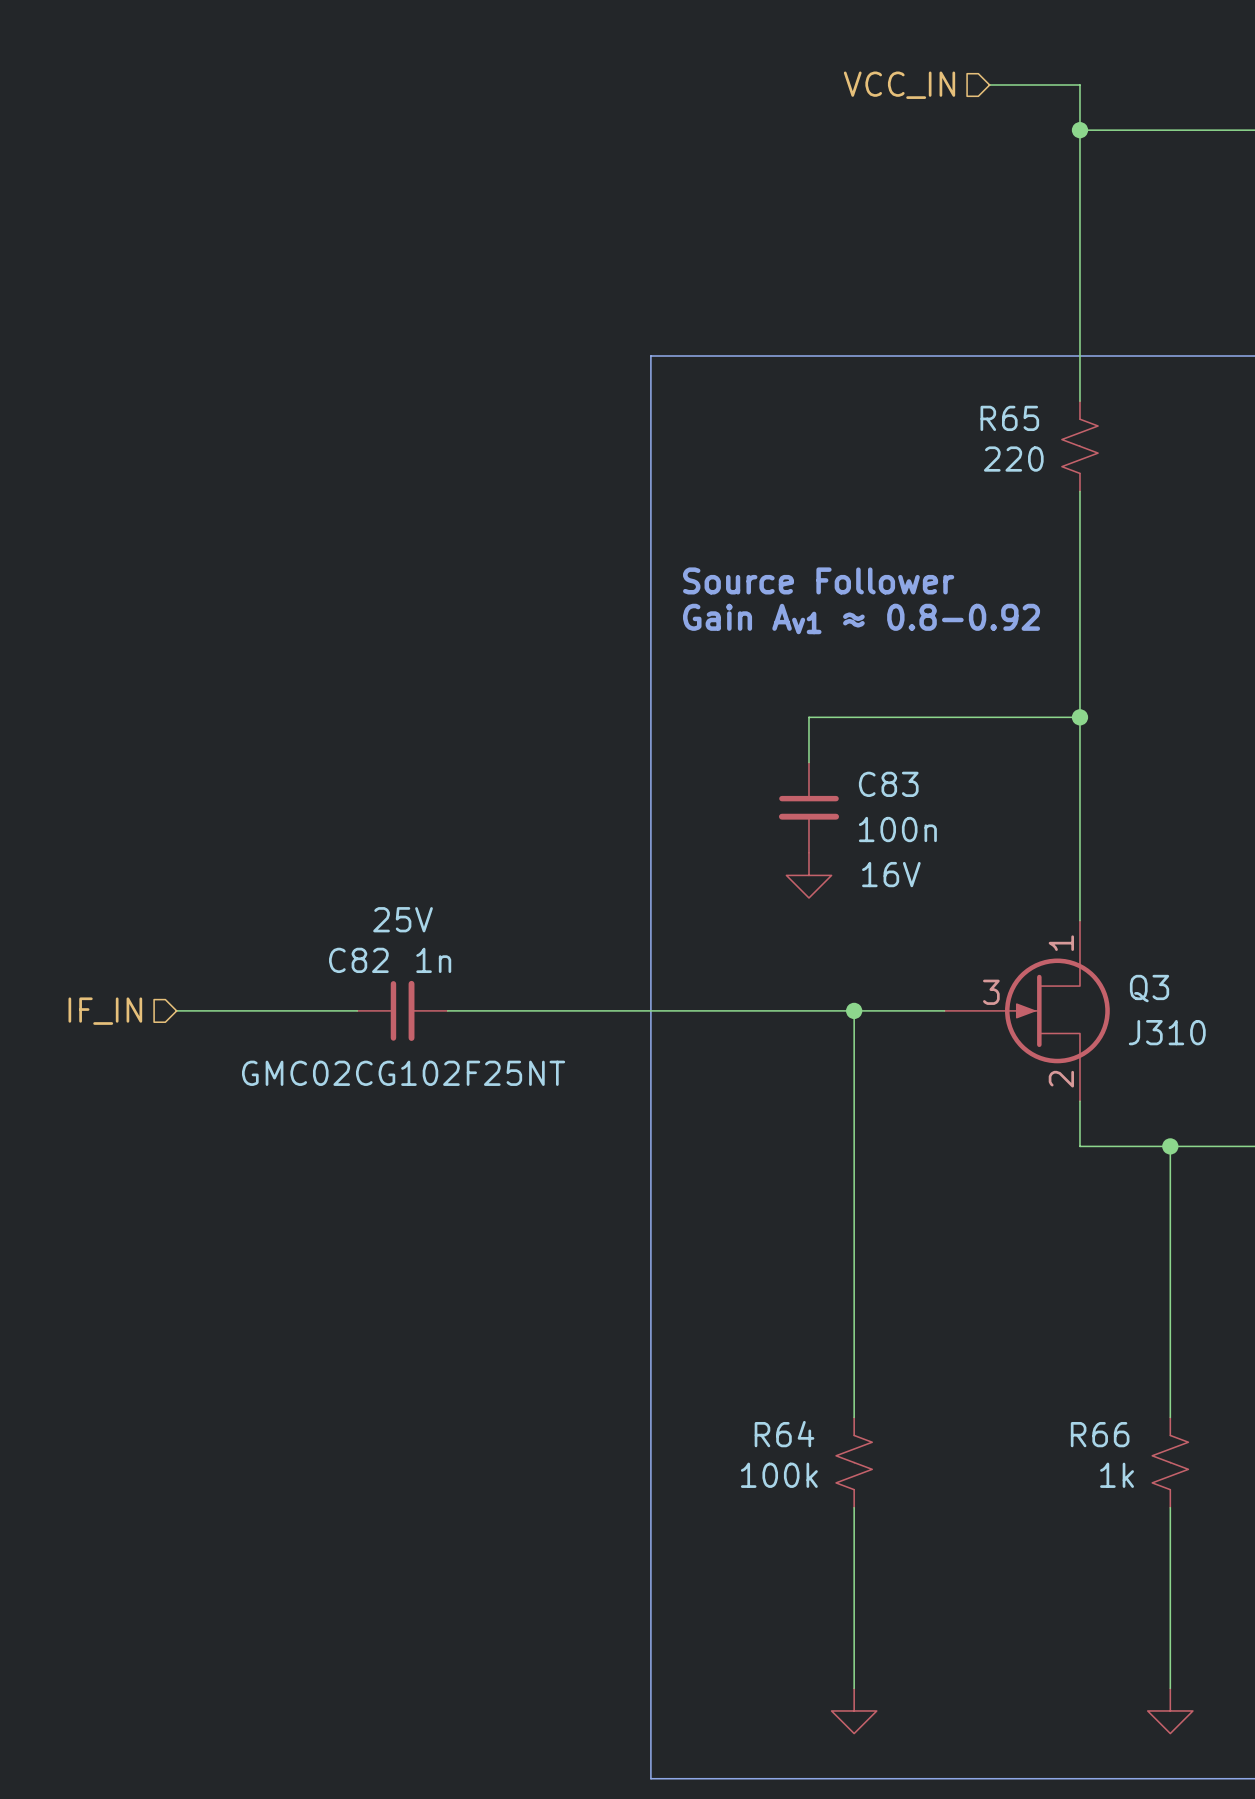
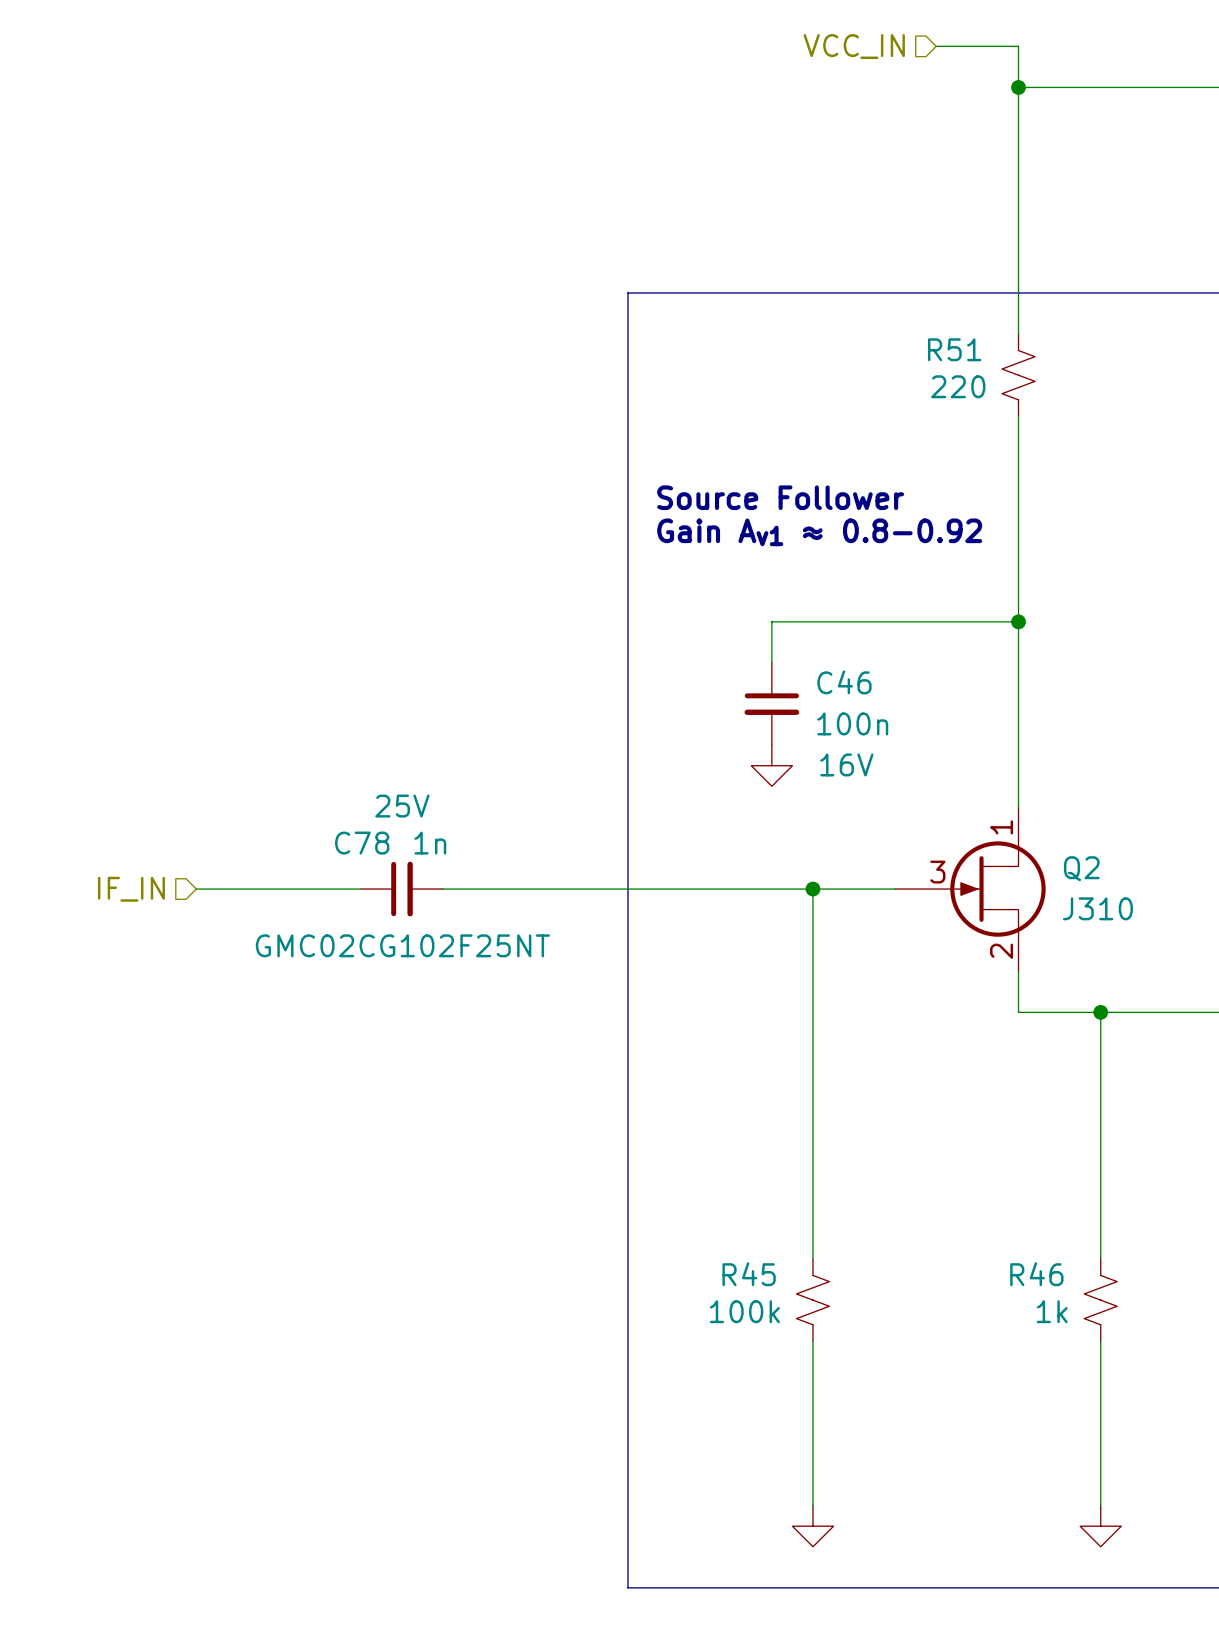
R65 name: R65 (1009, 418) -> R51 (954, 349)
C83 name: C83 (888, 784) -> C46 (844, 682)
C82 name: C82 (358, 960) -> C78 (362, 843)
Q3 name: Q3 (1149, 988) -> Q2 (1081, 868)
R64 name: R64 (784, 1434) -> R45 (749, 1274)
R66 name: R66 (1100, 1434) -> R46 (1036, 1274)

